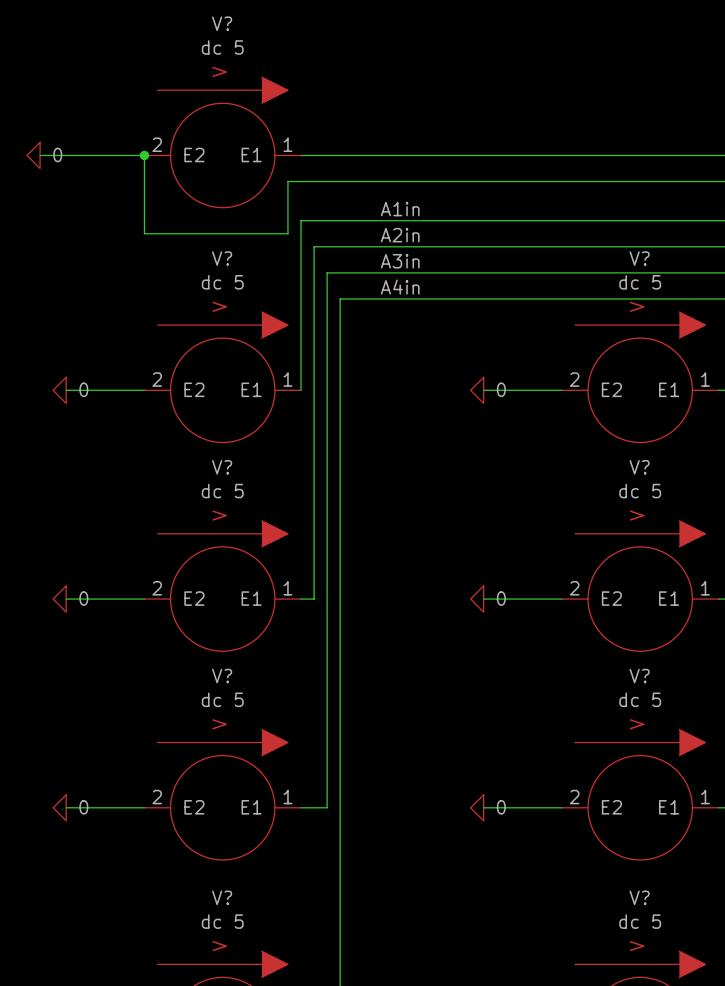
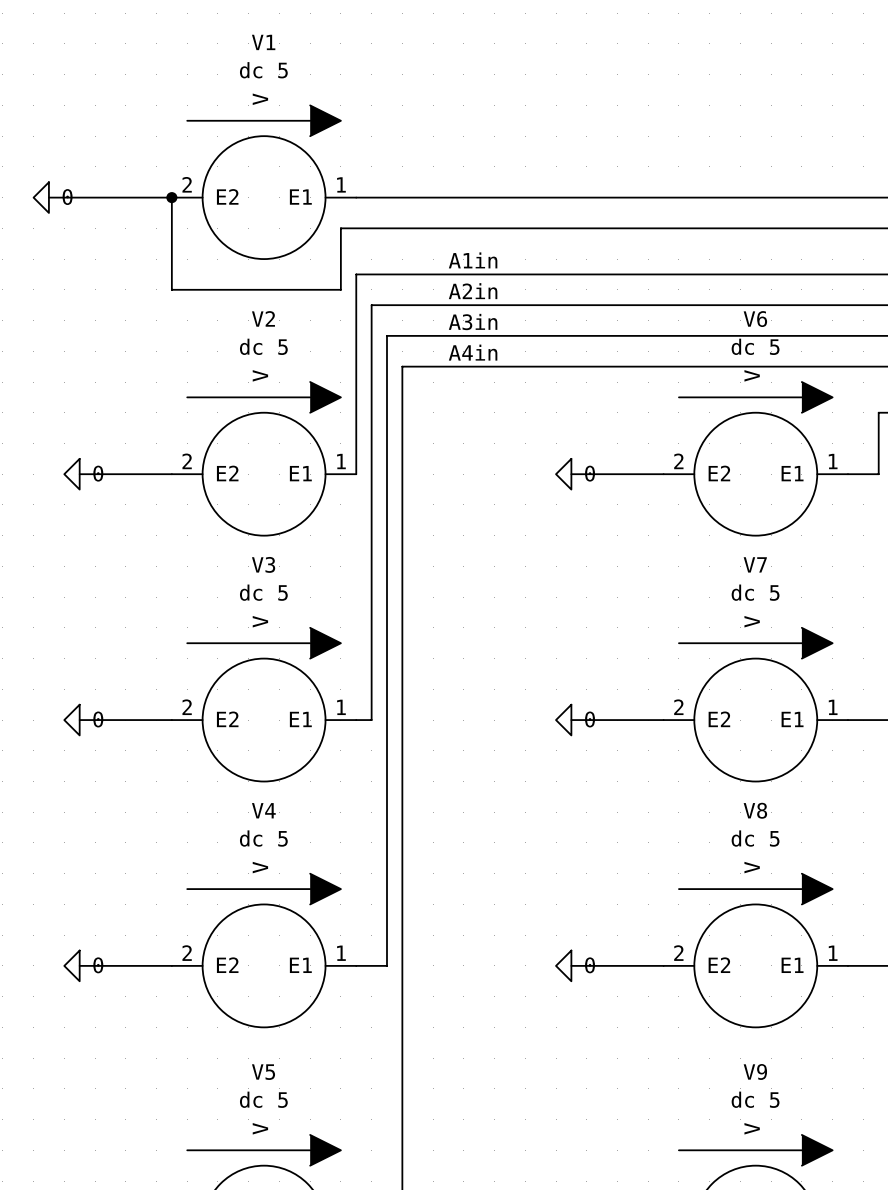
V? name: V? (222, 23) -> V1 (263, 42)
V? name: V? (222, 258) -> V2 (263, 318)
V? name: V? (639, 258) -> V6 (755, 319)
V? name: V? (222, 467) -> V3 (263, 564)
V? name: V? (639, 467) -> V7 (755, 564)
V? name: V? (222, 676) -> V4 (263, 810)
V? name: V? (639, 676) -> V8 (755, 810)
V? name: V? (222, 897) -> V5 (263, 1072)
V? name: V? (639, 897) -> V9 (755, 1071)

